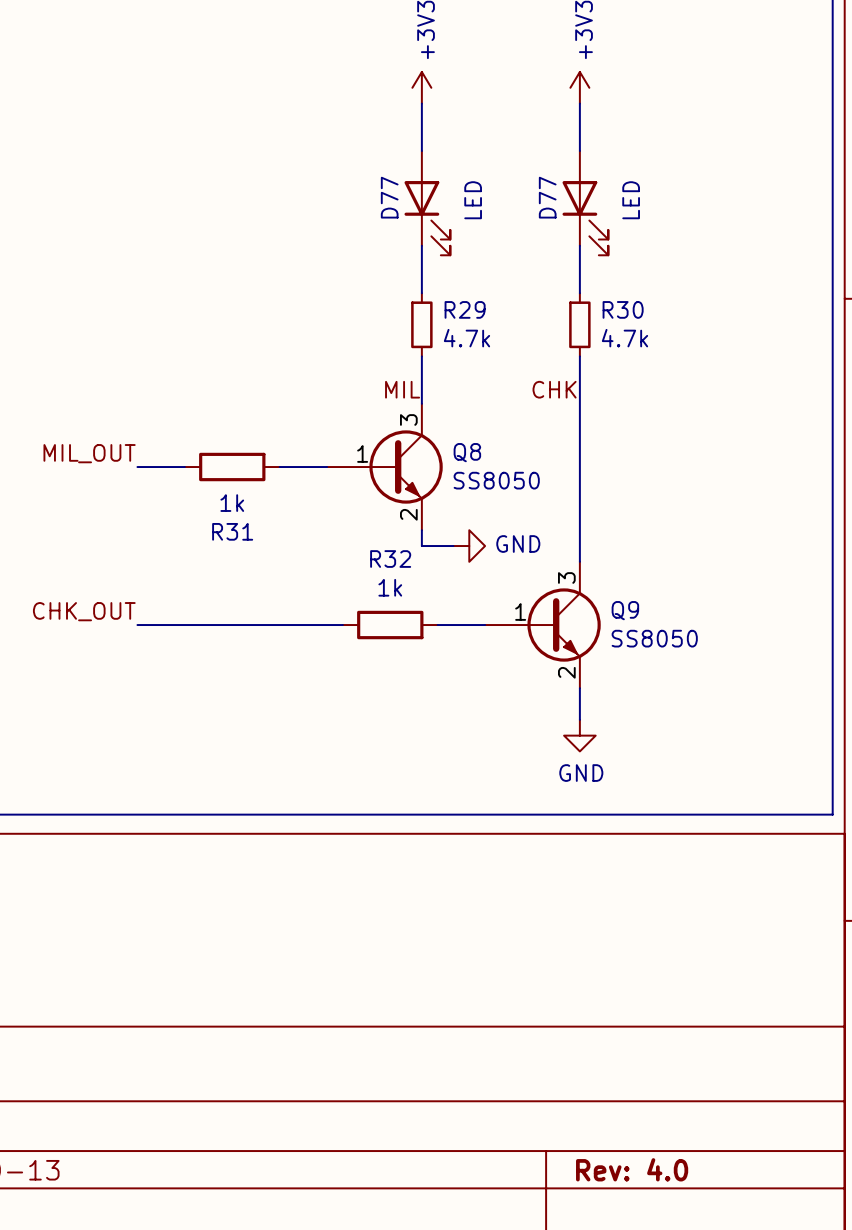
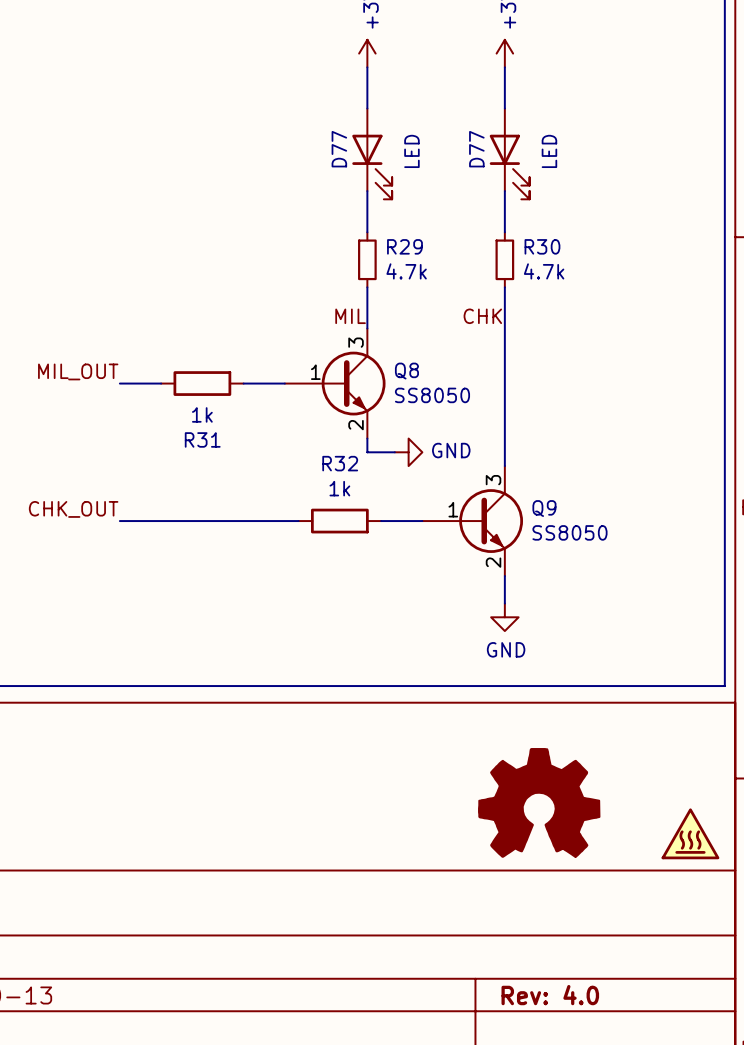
part: none -> (539, 802)
part: none -> (690, 833)

